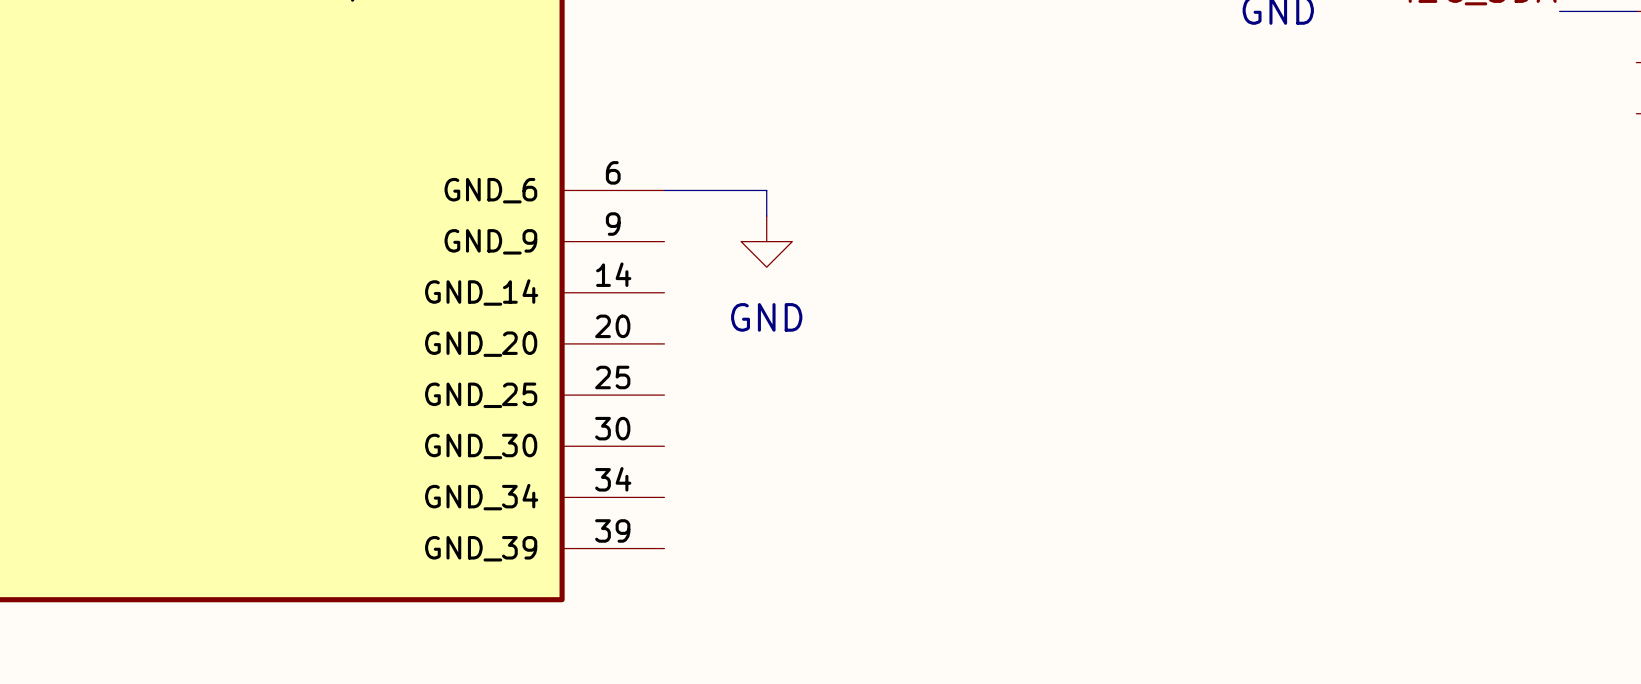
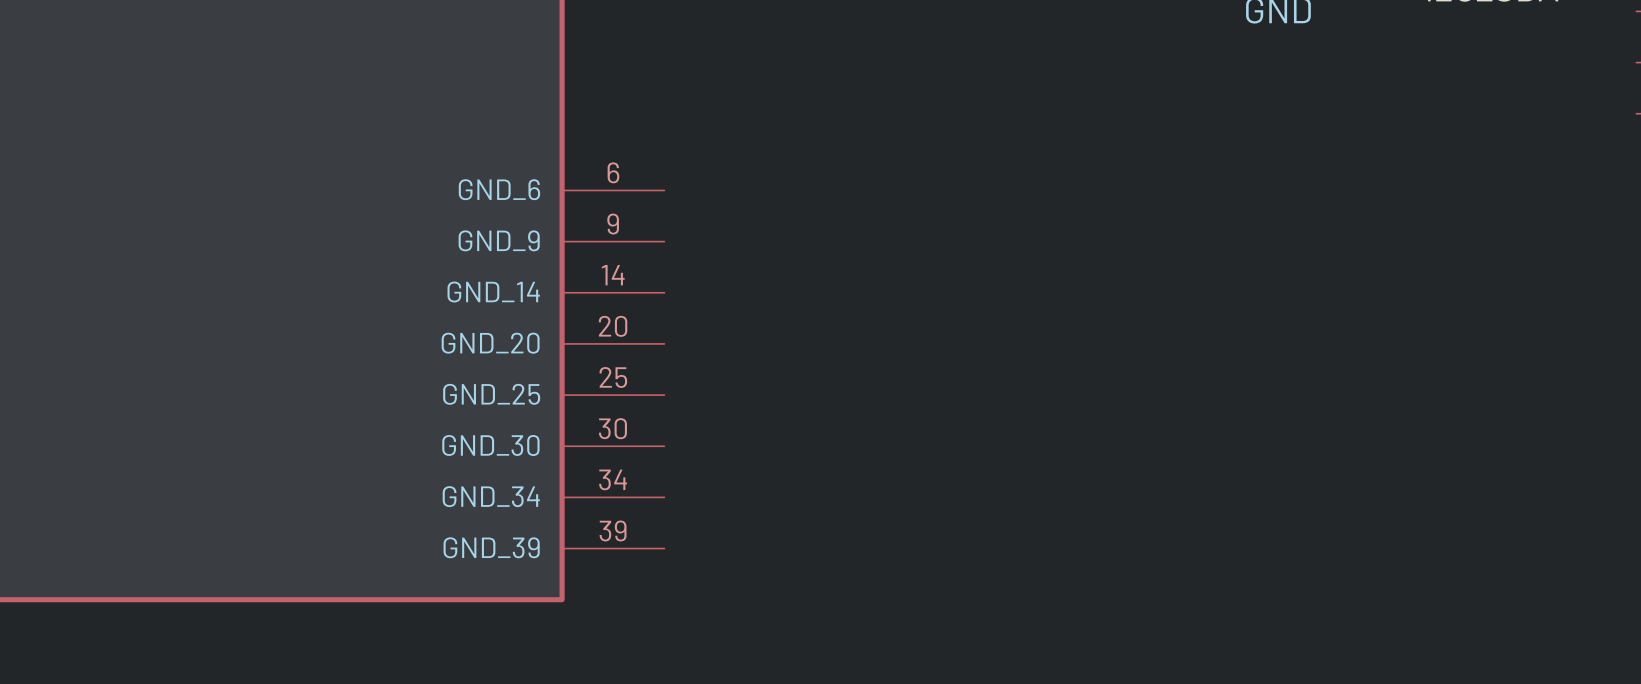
wire: (1559, 11) (1636, 11) -> none
wire: (664, 190) (766, 190) (766, 216) -> none
power symbol: GND (766, 241) -> none

